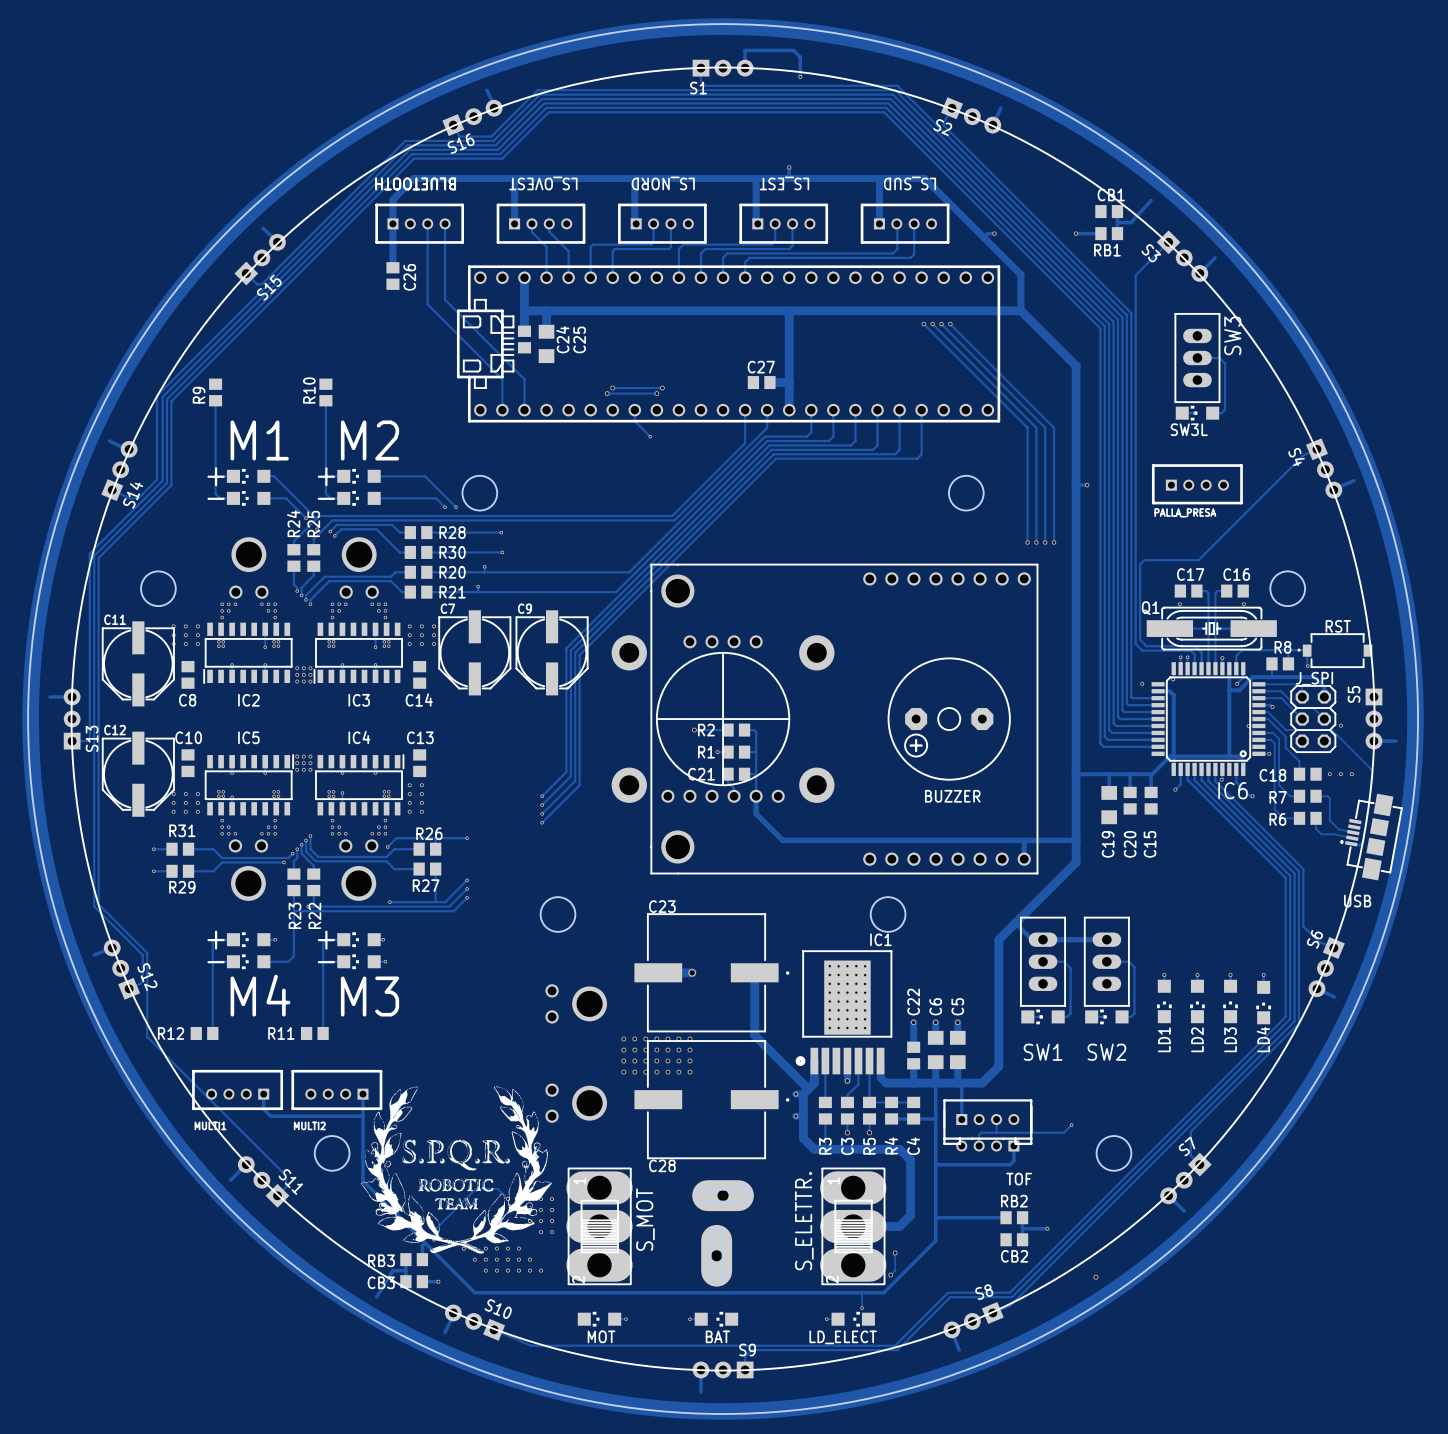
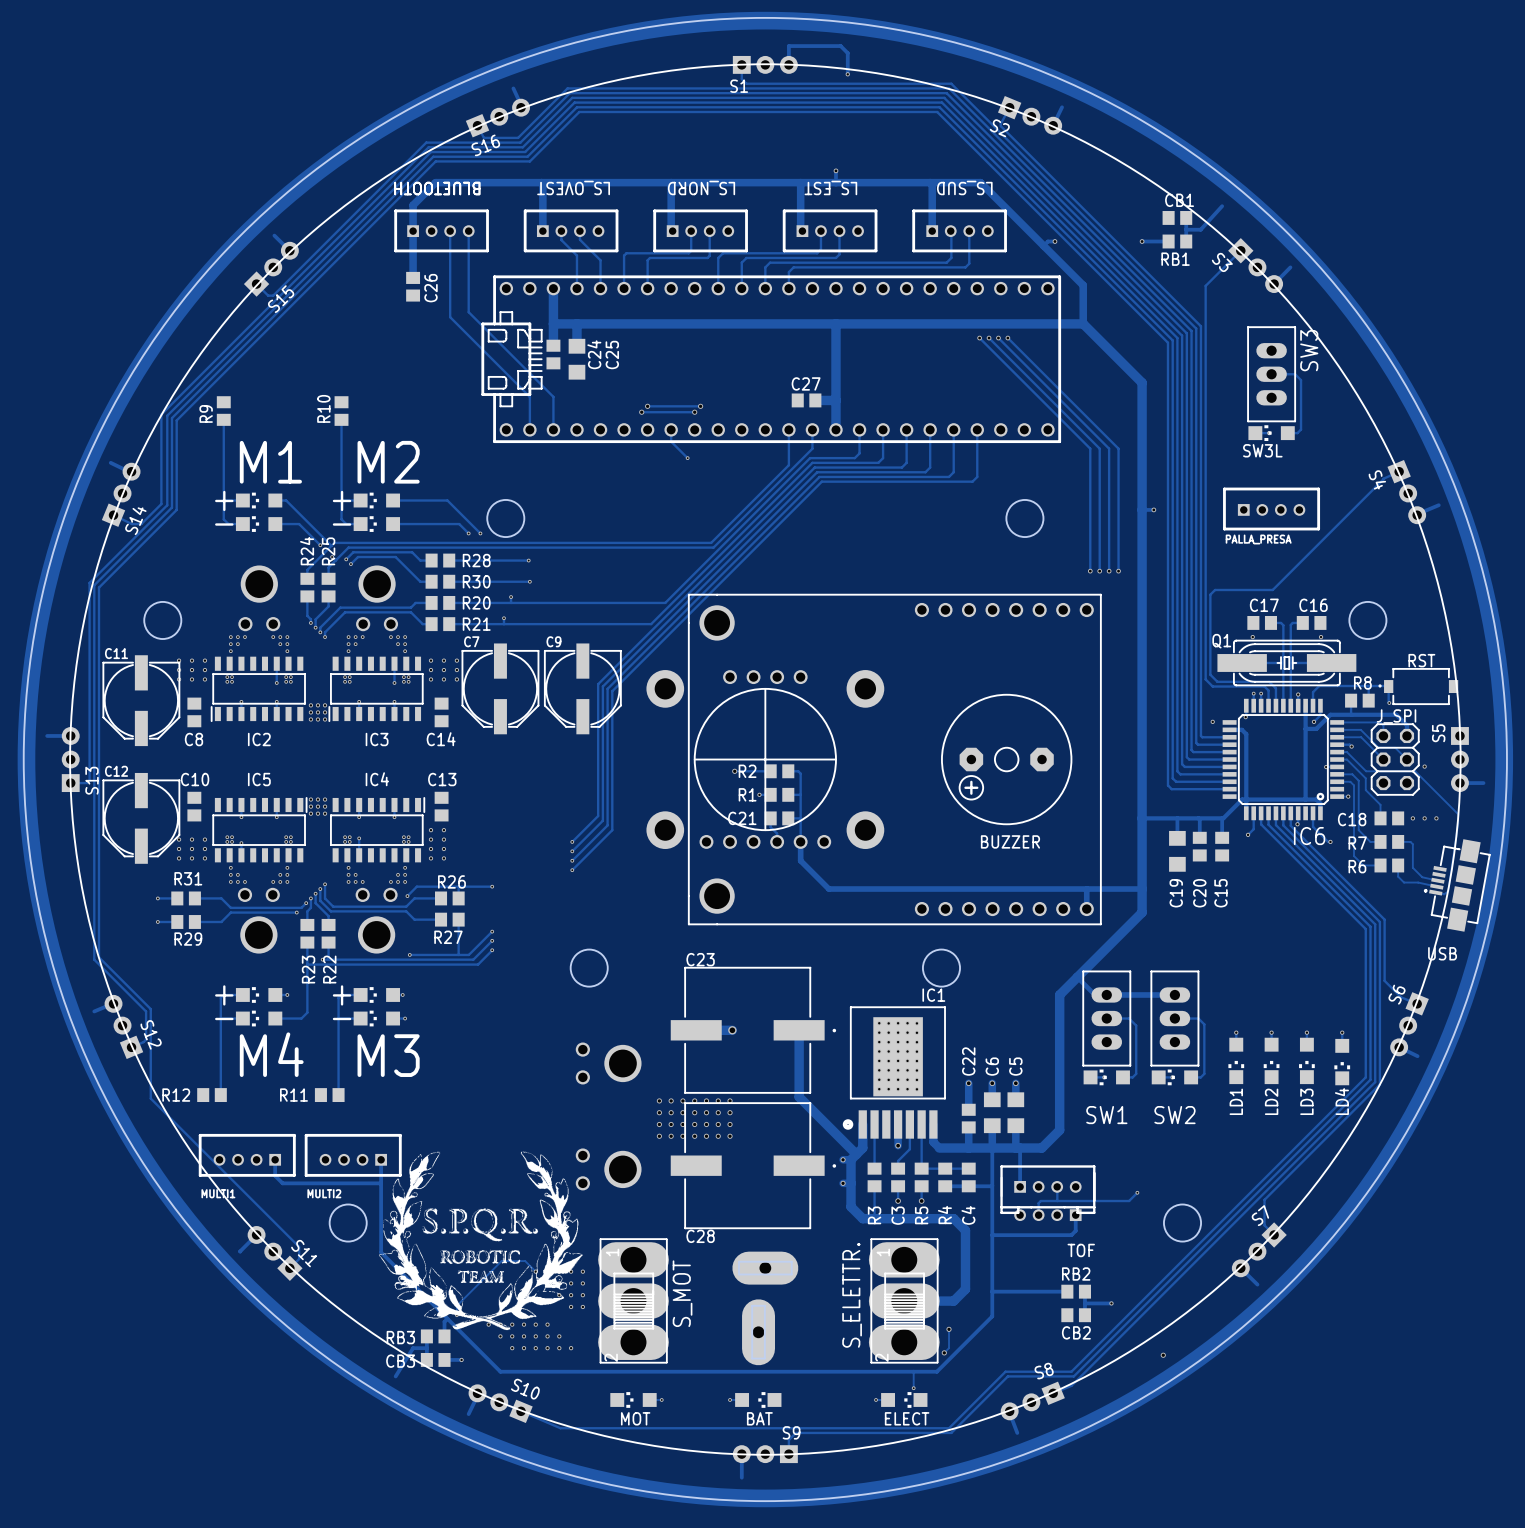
LD_ELECT name: LD_ELECT (843, 1337) -> ELECT (907, 1418)

